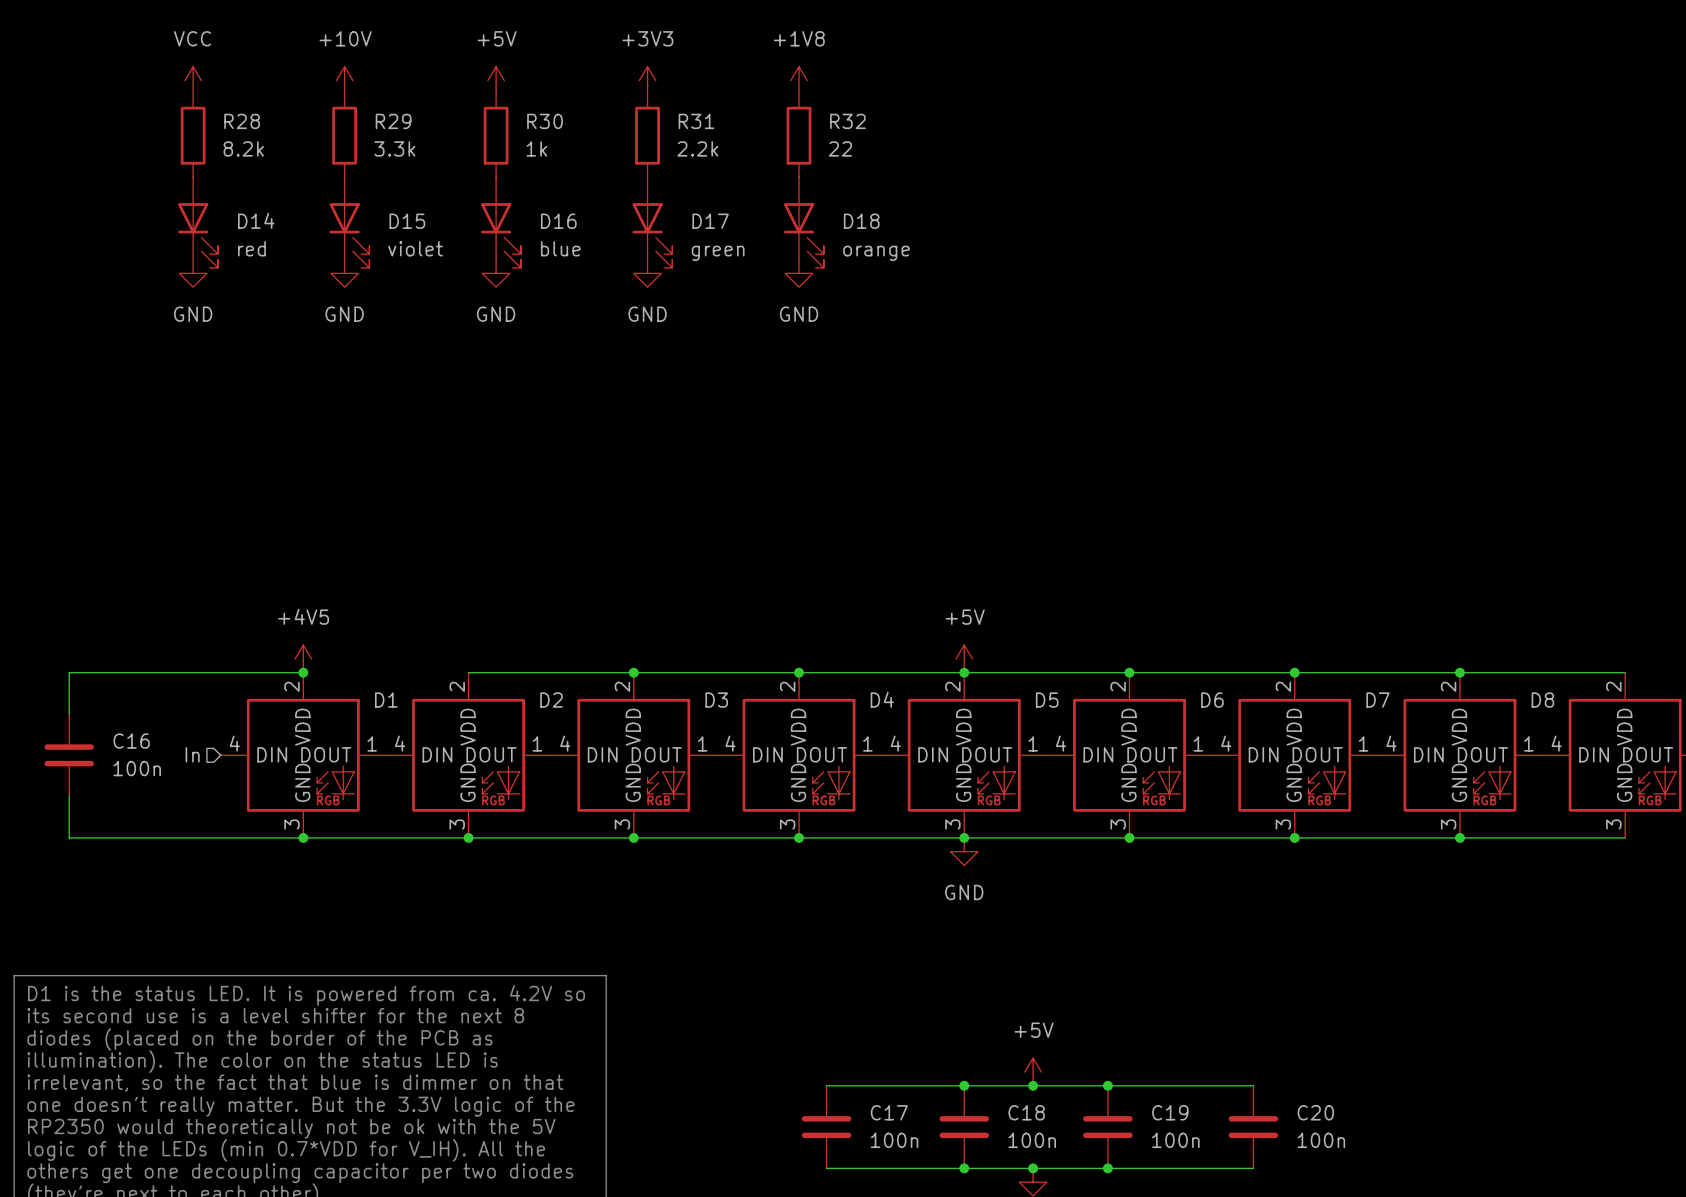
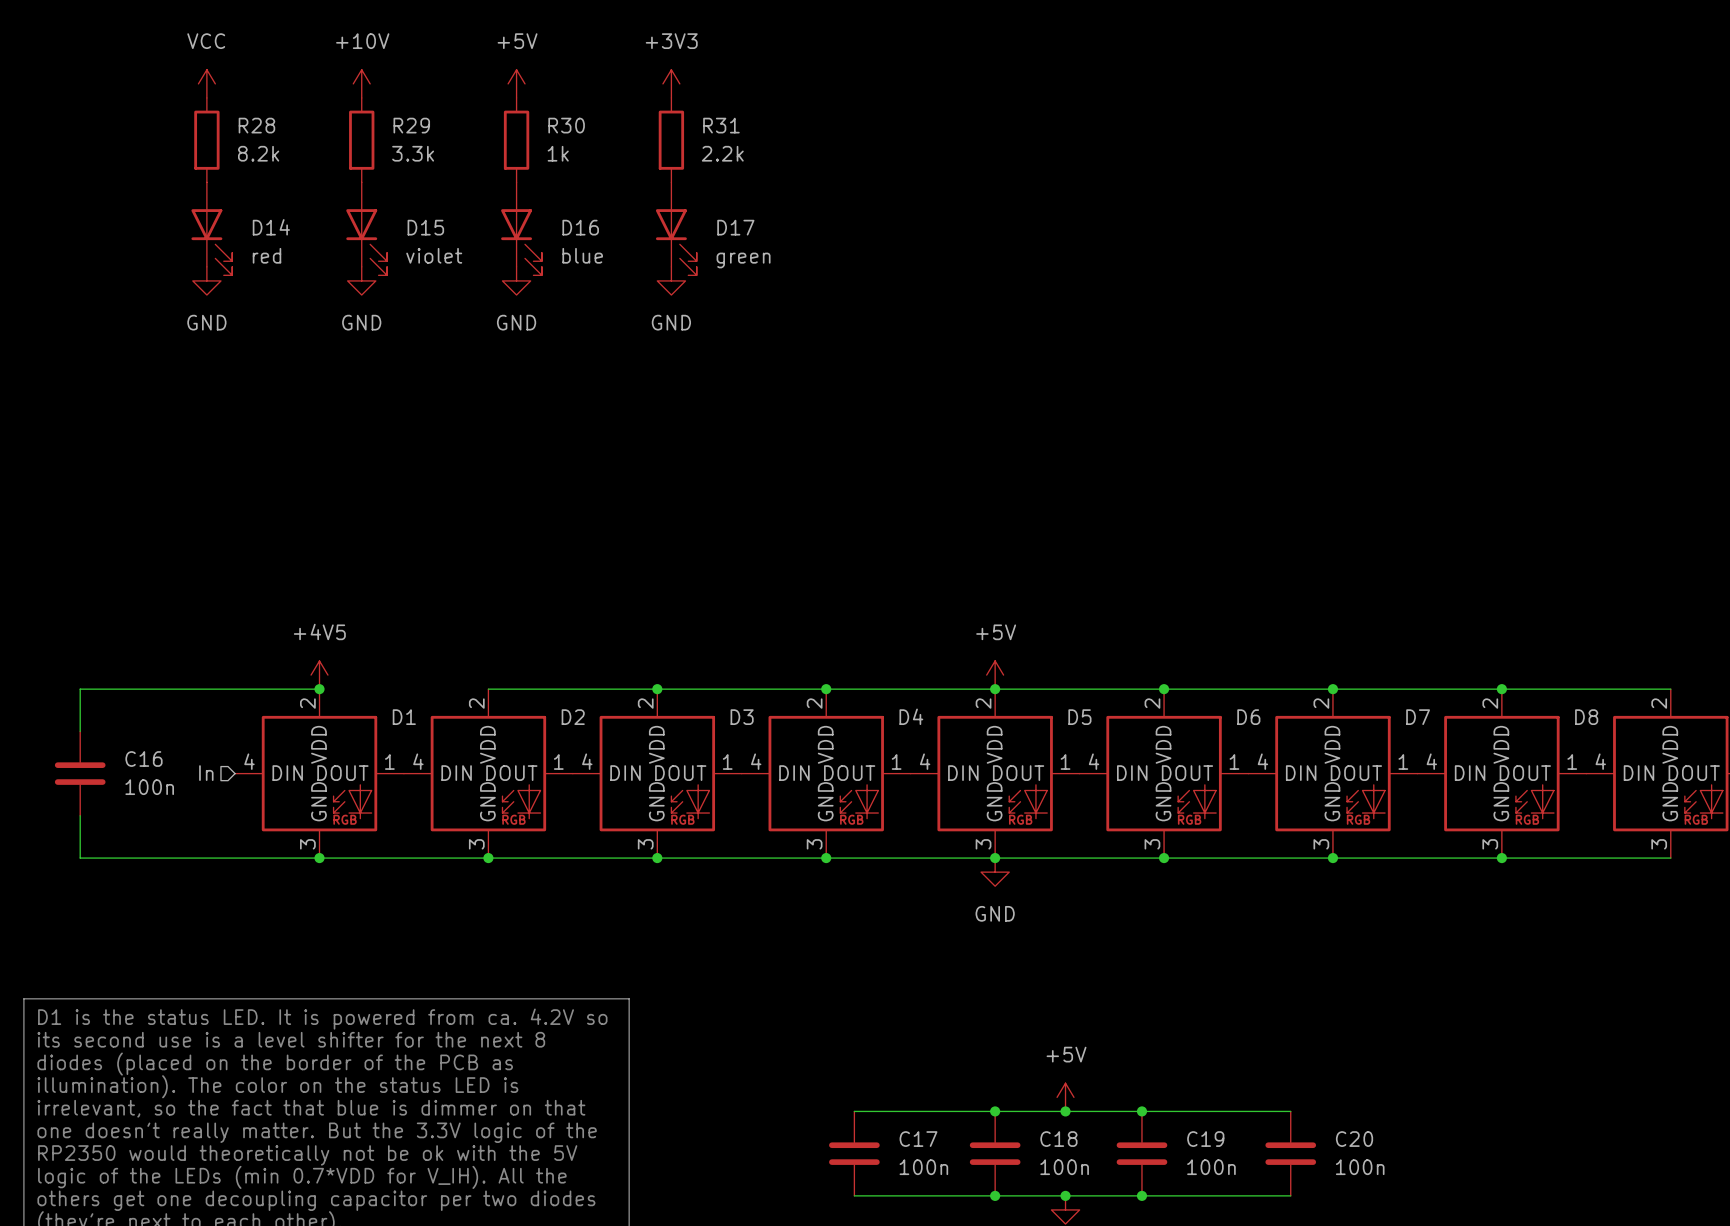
power symbol: +1V8 (799, 80) -> none
R32: 22 (799, 135) -> none
D18: orange (803, 222) -> none
power symbol: GND (799, 273) -> none

